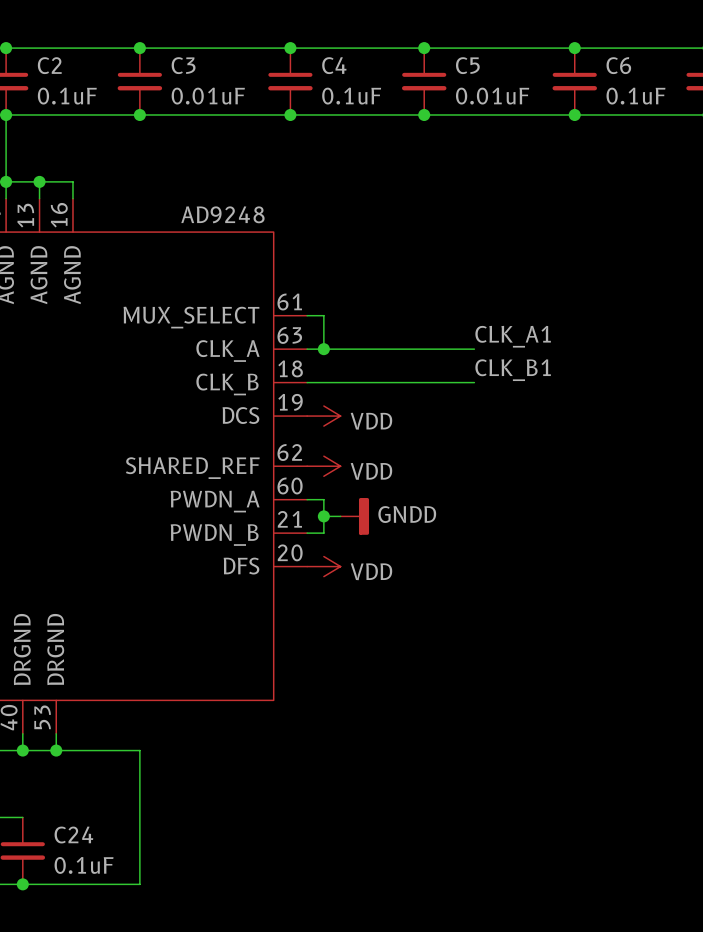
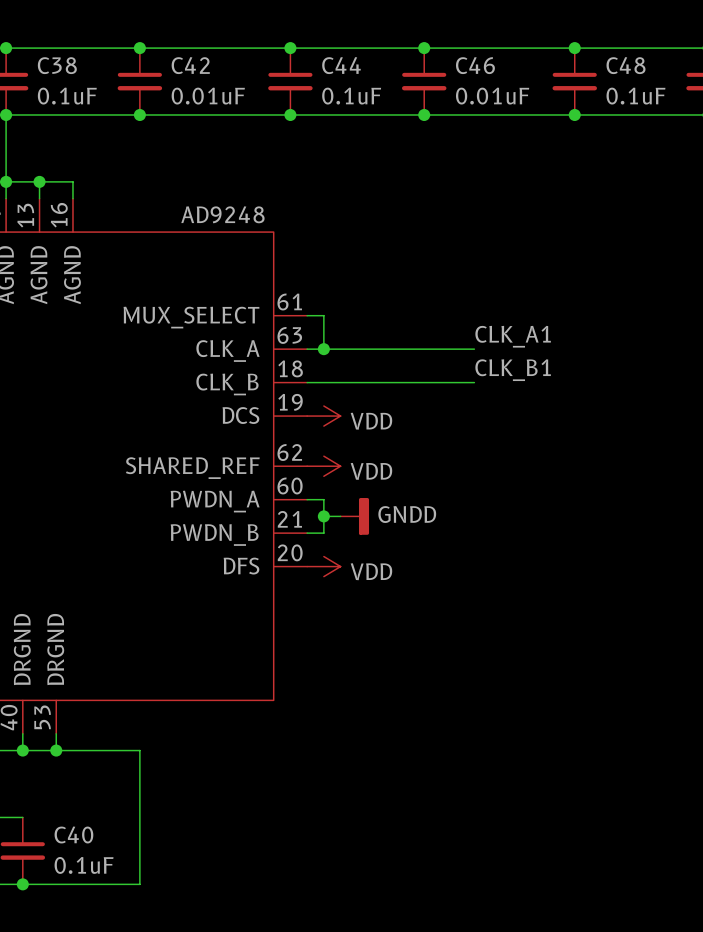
C2 name: C2 (49, 65) -> C38 (57, 65)
C3 name: C3 (183, 65) -> C42 (190, 65)
C4 name: C4 (334, 65) -> C44 (341, 65)
C5 name: C5 (467, 65) -> C46 (475, 65)
C6 name: C6 (618, 65) -> C48 (625, 65)
C24 name: C24 (73, 834) -> C40 (73, 834)

